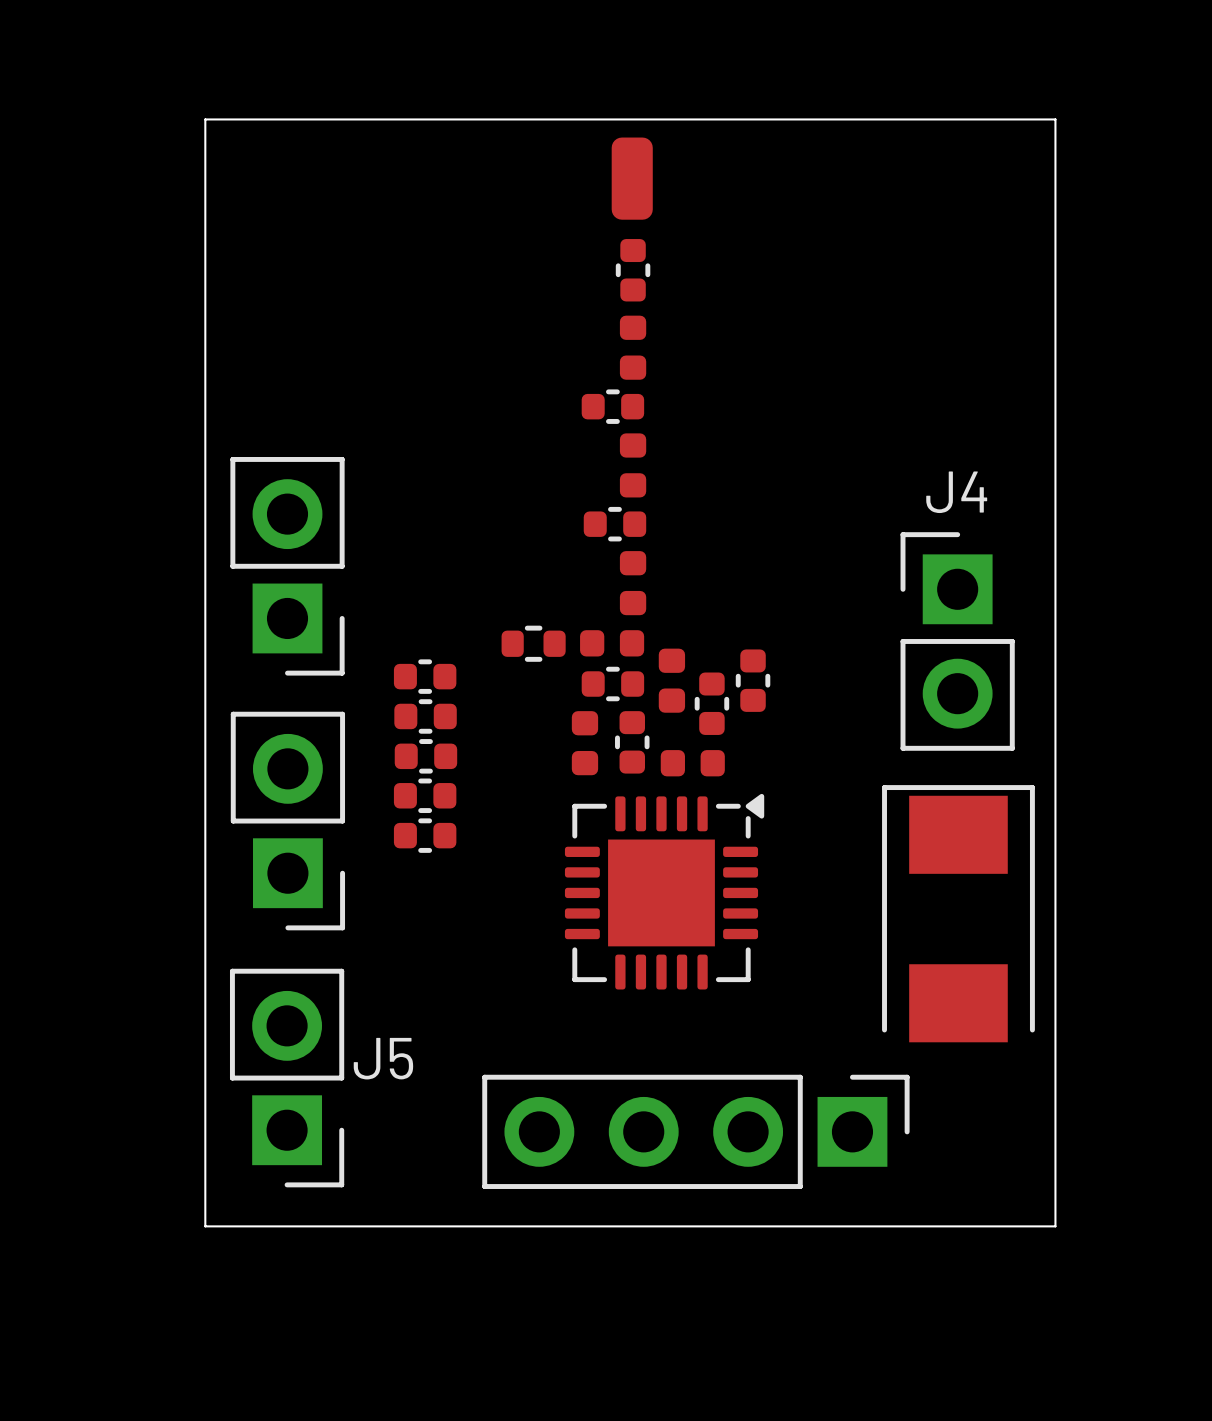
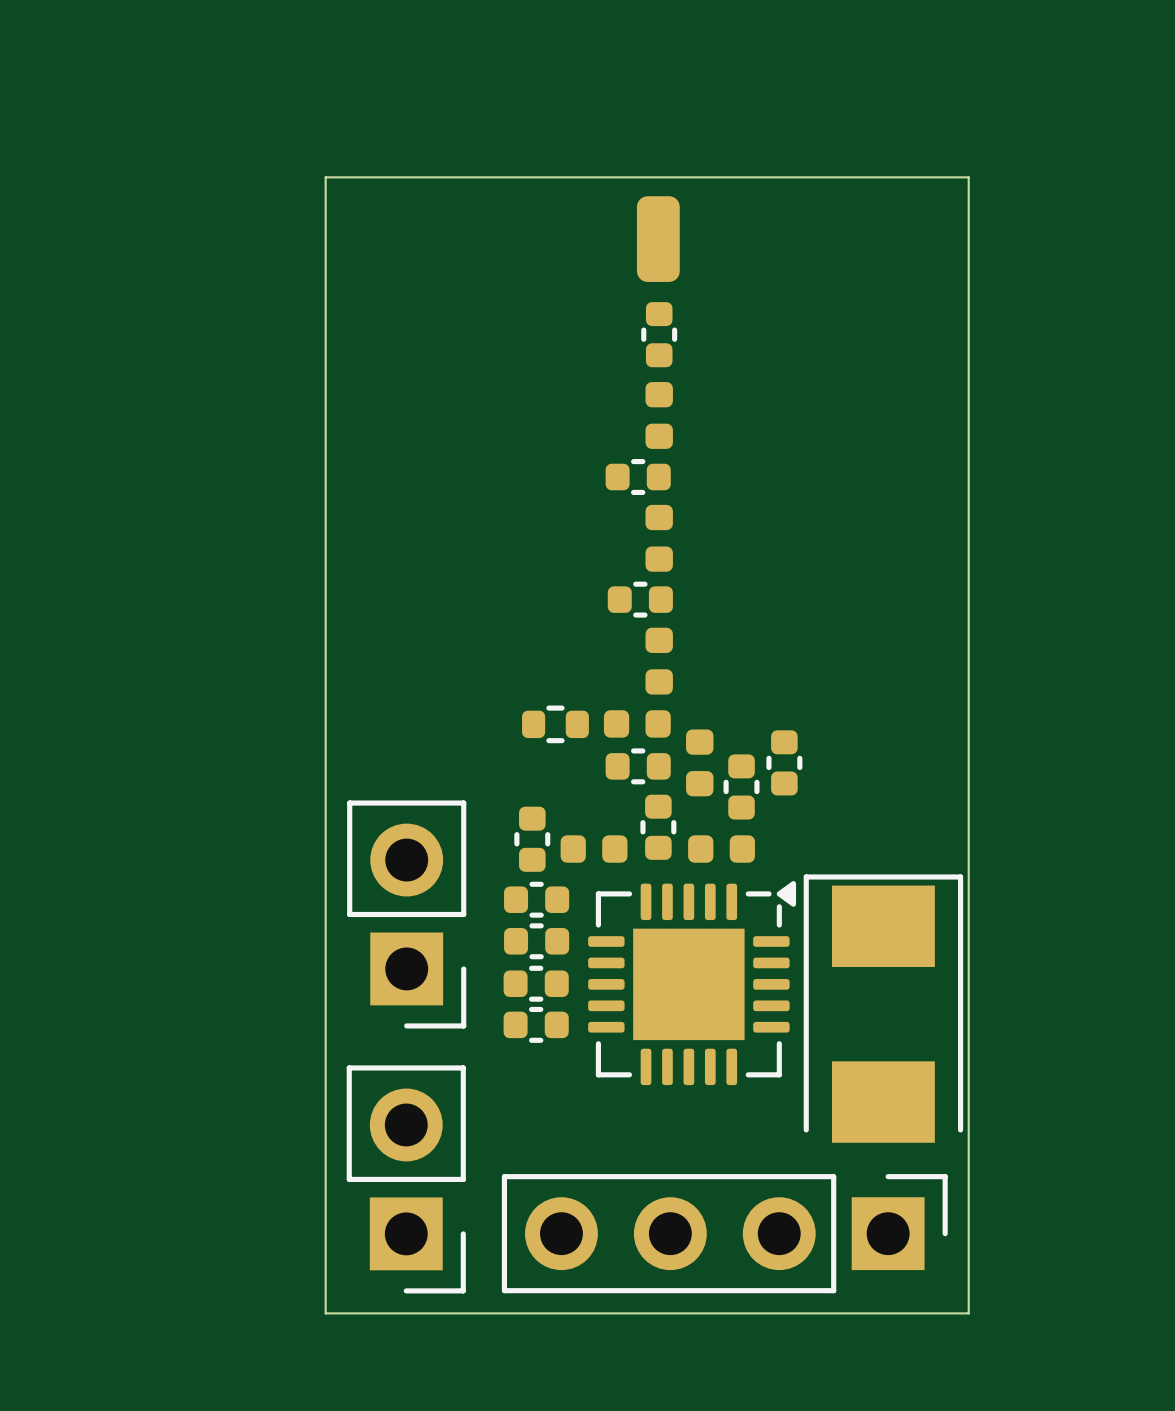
board edge: (313, 119) (205, 119) (205, 1226) (1055, 1226) (1055, 119) (929, 119) -> (325, 177) (325, 1313) (968, 1313) (968, 177)
part: (287, 566) -> none
J4: (957, 641) -> none
part: (425, 676) -> none
part: (425, 716) -> none
part rotation: 0° (584, 743) -> 90° clockwise (594, 849)
part: none -> (532, 839)
part: (425, 756) -> none
part: (425, 795) -> none
part: none -> (536, 899)
J5: (287, 821) -> none
part: none -> (406, 914)
part: (425, 835) -> none
part: none -> (536, 941)
part: none -> (536, 983)
part position: (958, 913) -> (883, 1008)
part: none -> (536, 1024)
part position: (287, 1078) -> (406, 1179)

